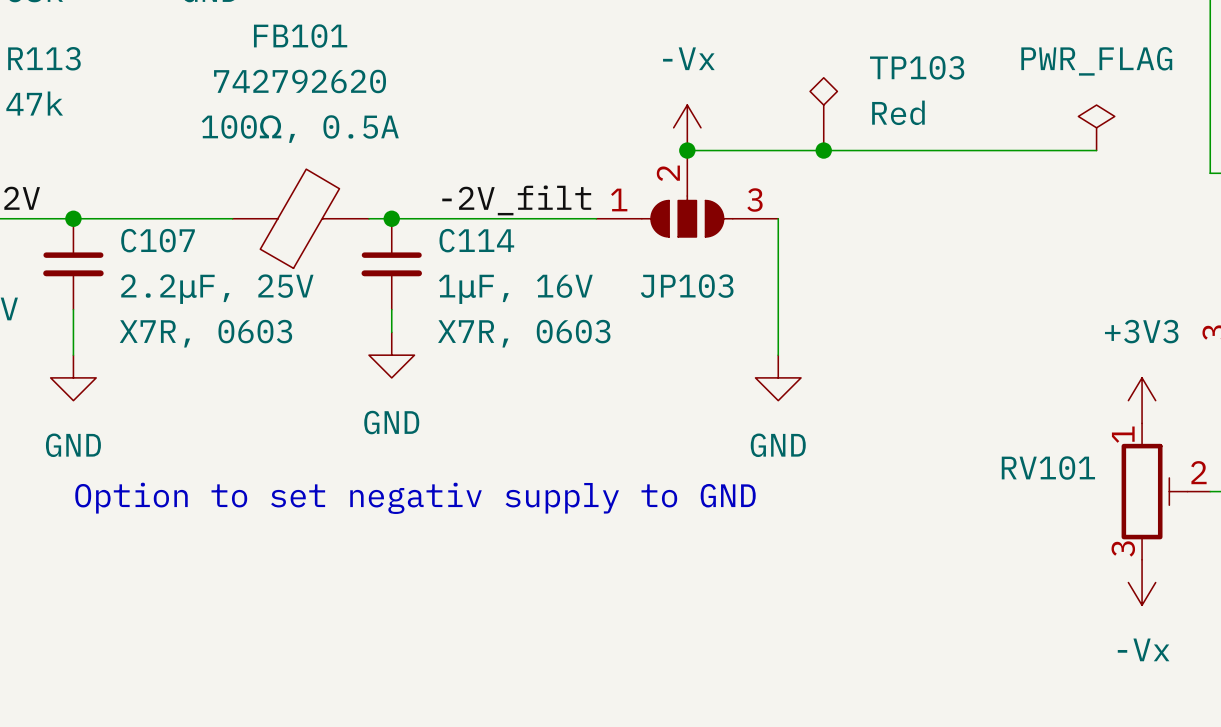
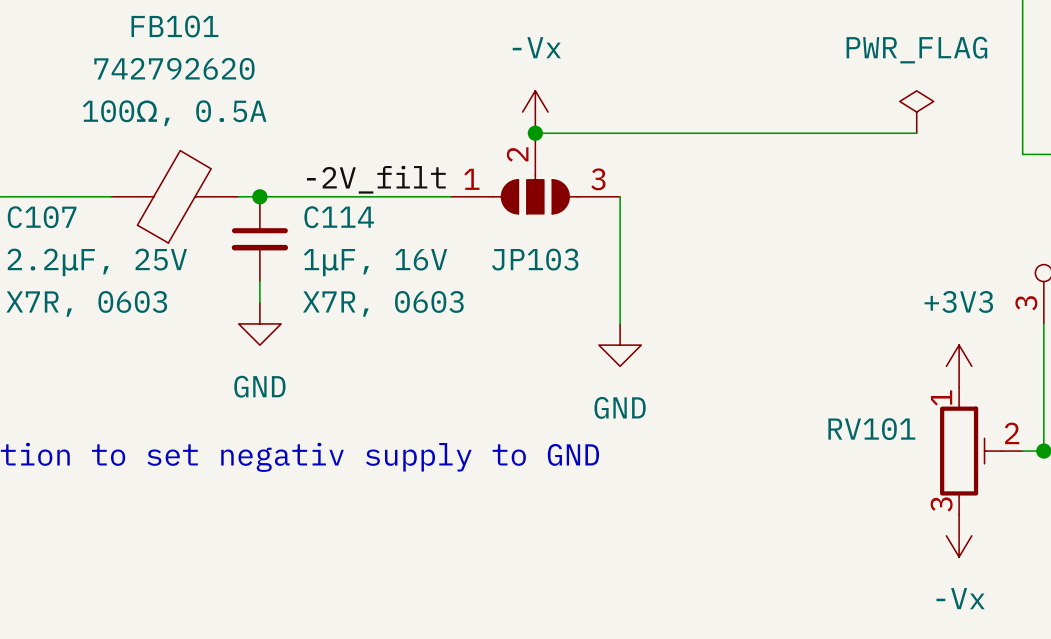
TP103: (823, 114) -> none
junction: (823, 150) -> none

